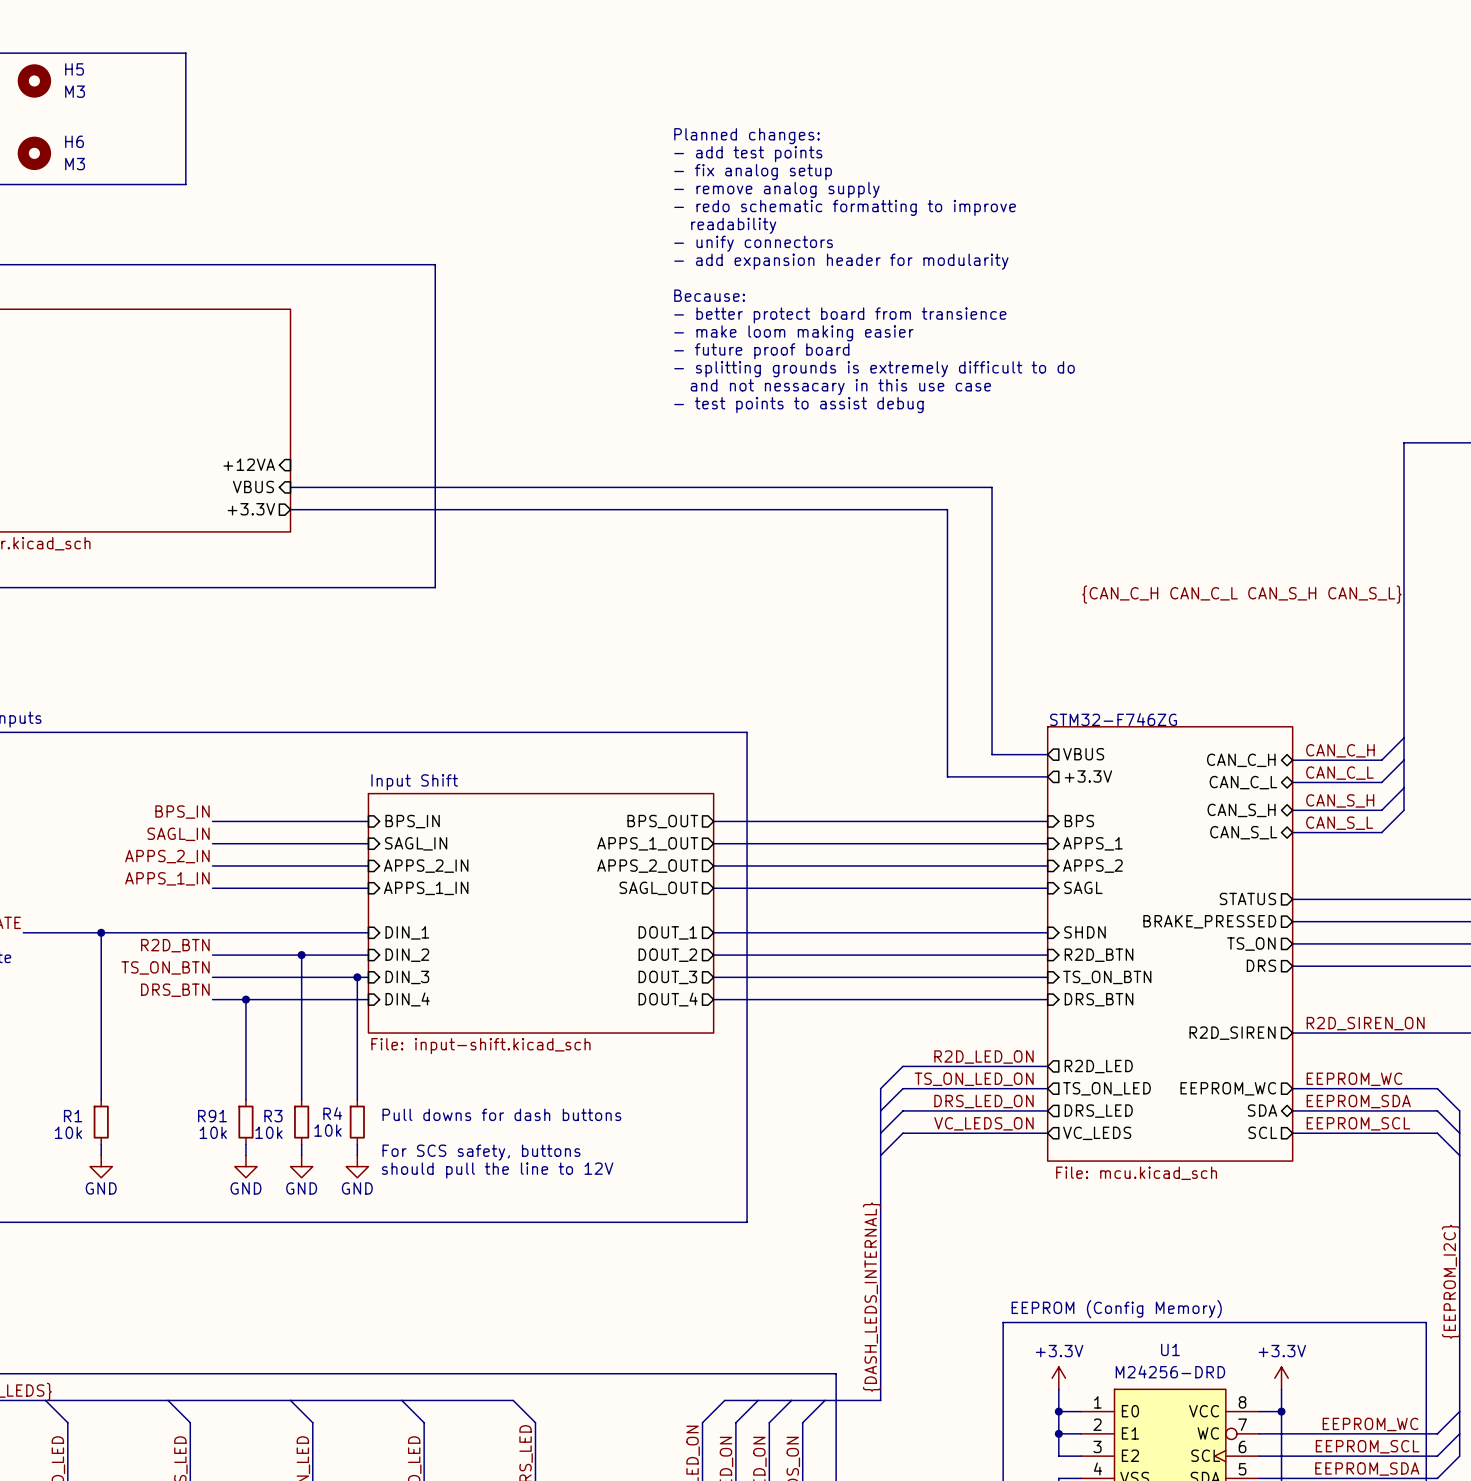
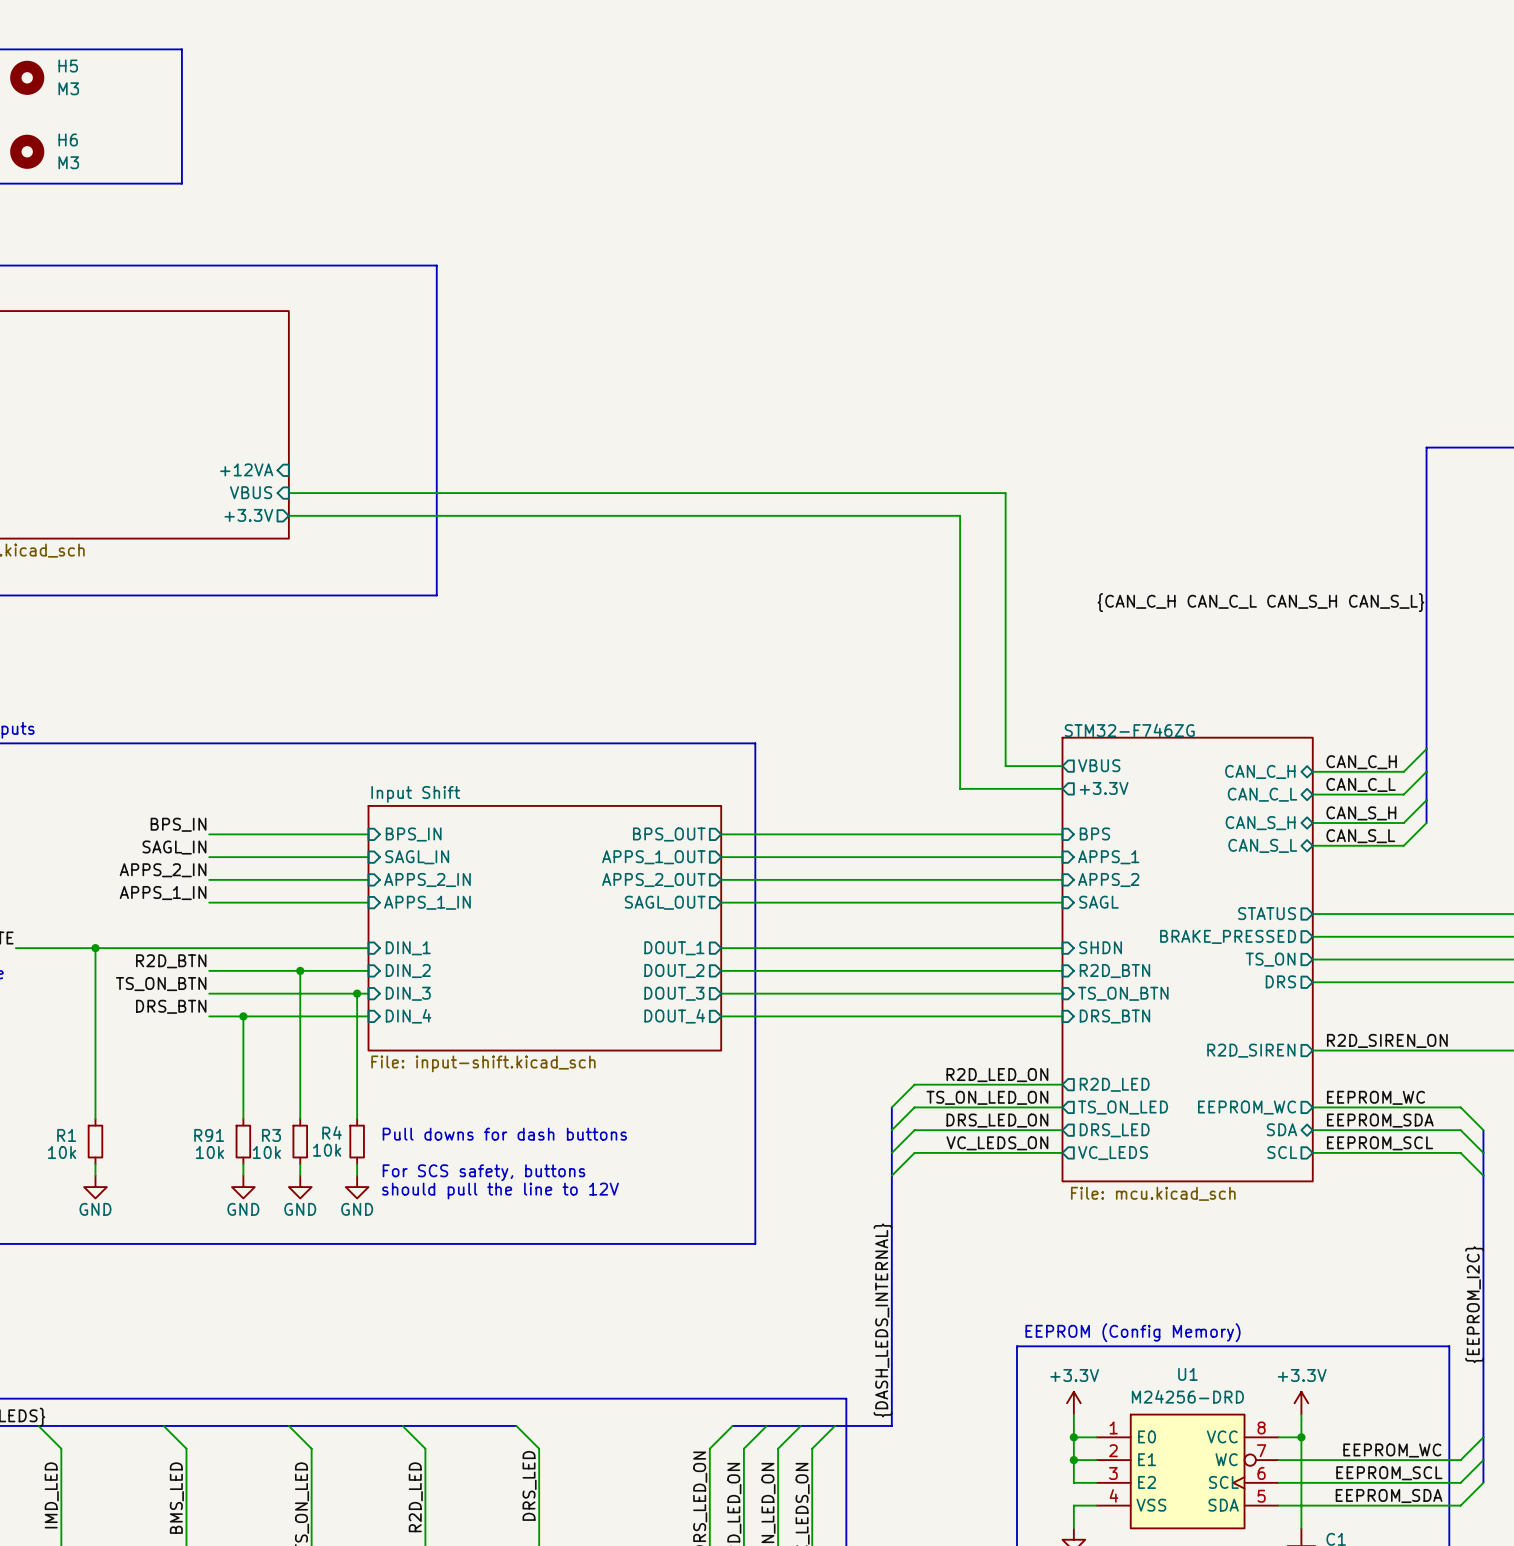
text: Planned changes: (746, 136) -> none
text: - add test points (748, 154) -> none
text: - fix analog setup (753, 172) -> none
text: - remove analog supply (776, 189) -> none
text: - redo schematic formatting to improve (845, 207) -> none
text: readability (733, 225) -> none
text: - unify connectors (753, 243) -> none
text: - add expansion header for modularity (841, 261) -> none
text: Because: (709, 295) -> none
text: - better protect board from transience (840, 315) -> none
text: - make loom making easier (793, 333) -> none
text: - future proof board (761, 351) -> none
text: - splitting grounds is extremely difficult to do (874, 369) -> none
text: and not nessacary in this use case (840, 387) -> none
text: - test points to assist debug (798, 405) -> none

